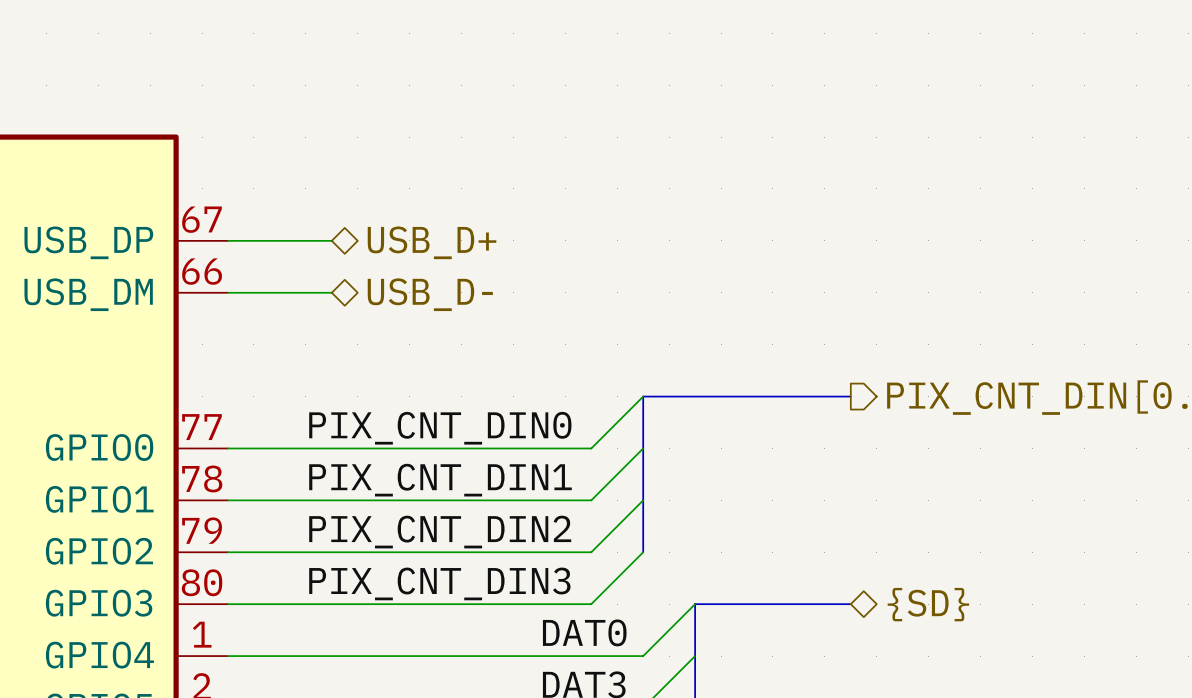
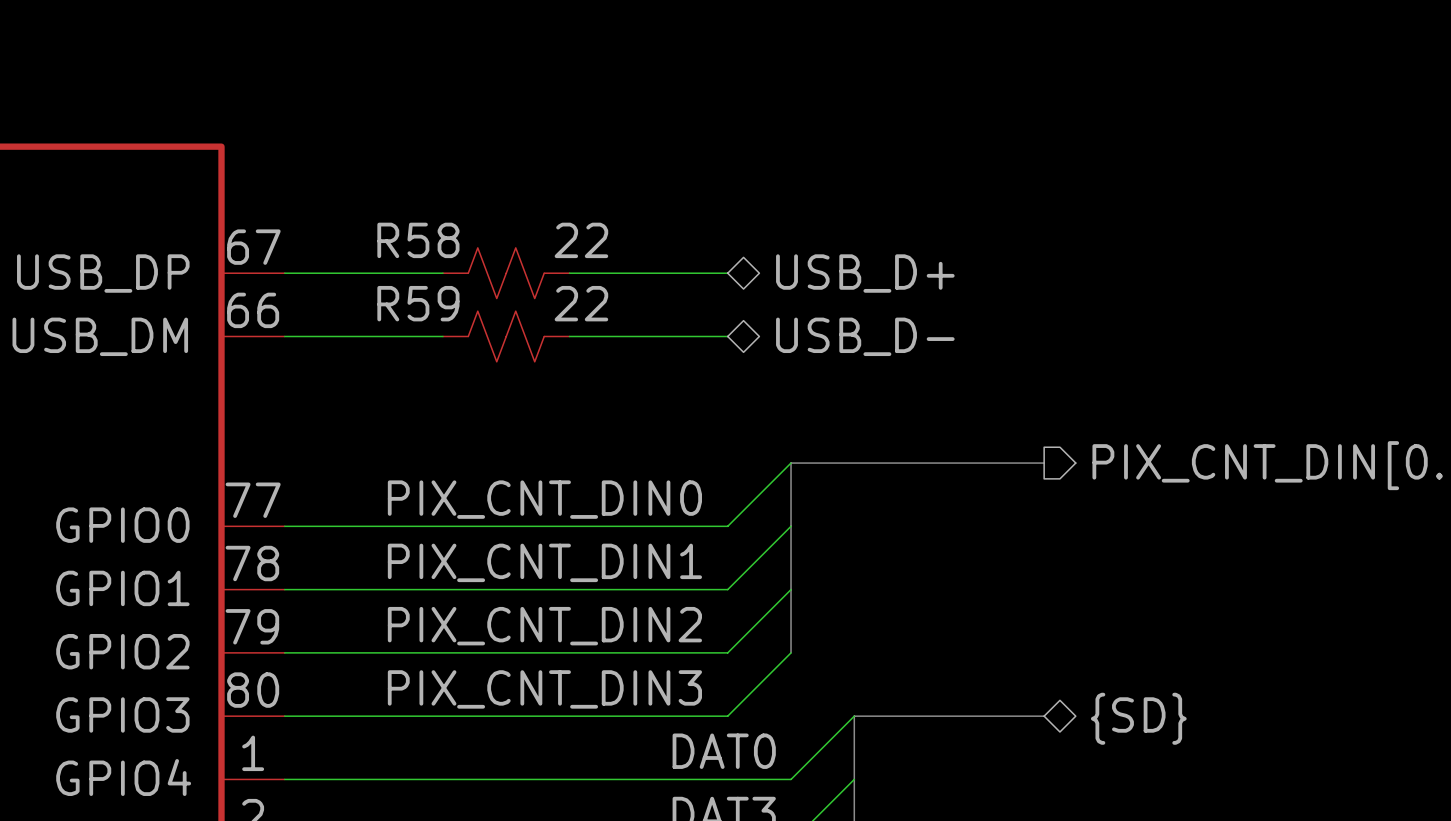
wire: none -> (411, 273) (442, 273)
R58: none -> 22 (506, 273)
wire: none -> (569, 273) (727, 273)
hierarchical label position: USB_D+ (432, 242) -> USB_D+ (865, 273)
wire: none -> (411, 336) (442, 336)
R59: none -> 22 (506, 336)
wire: none -> (569, 336) (727, 336)
hierarchical label position: USB_D- (430, 294) -> USB_D- (865, 336)

